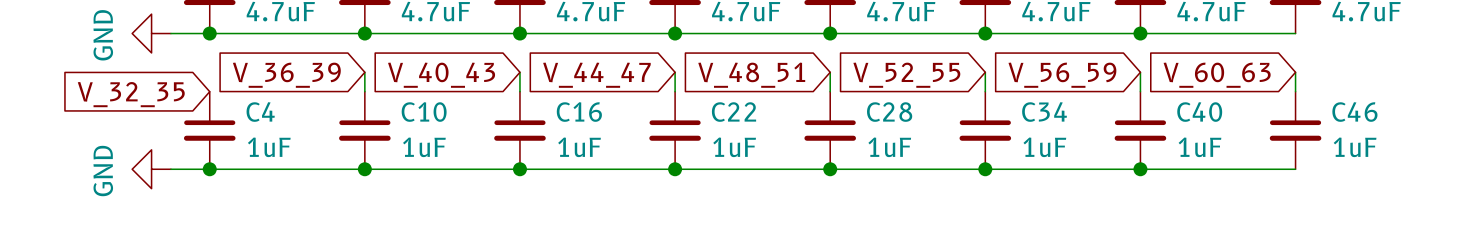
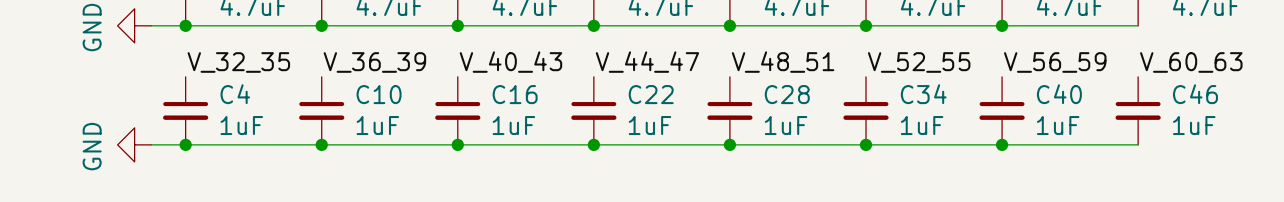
wire: (364, 72) (364, 91) -> none
wire: (519, 72) (519, 91) -> none
wire: (675, 72) (675, 91) -> none
wire: (830, 72) (830, 91) -> none
wire: (985, 72) (985, 91) -> none
wire: (1140, 72) (1140, 91) -> none
wire: (1295, 72) (1295, 91) -> none
global label: V_36_39 (286, 75) -> none
global label: V_40_43 (441, 75) -> none
global label: V_44_47 (596, 75) -> none
global label: V_48_51 (751, 75) -> none
global label: V_52_55 (906, 75) -> none
global label: V_56_59 (1062, 75) -> none
global label: V_60_63 (1217, 75) -> none
label: none -> V_32_35 (238, 62)
label: none -> V_36_39 (374, 62)
label: none -> V_40_43 (510, 62)
label: none -> V_44_47 (647, 62)
label: none -> V_48_51 (783, 62)
label: none -> V_52_55 (919, 62)
label: none -> V_56_59 (1055, 62)
label: none -> V_60_63 (1191, 62)
global label: V_32_35 (131, 94) -> none

